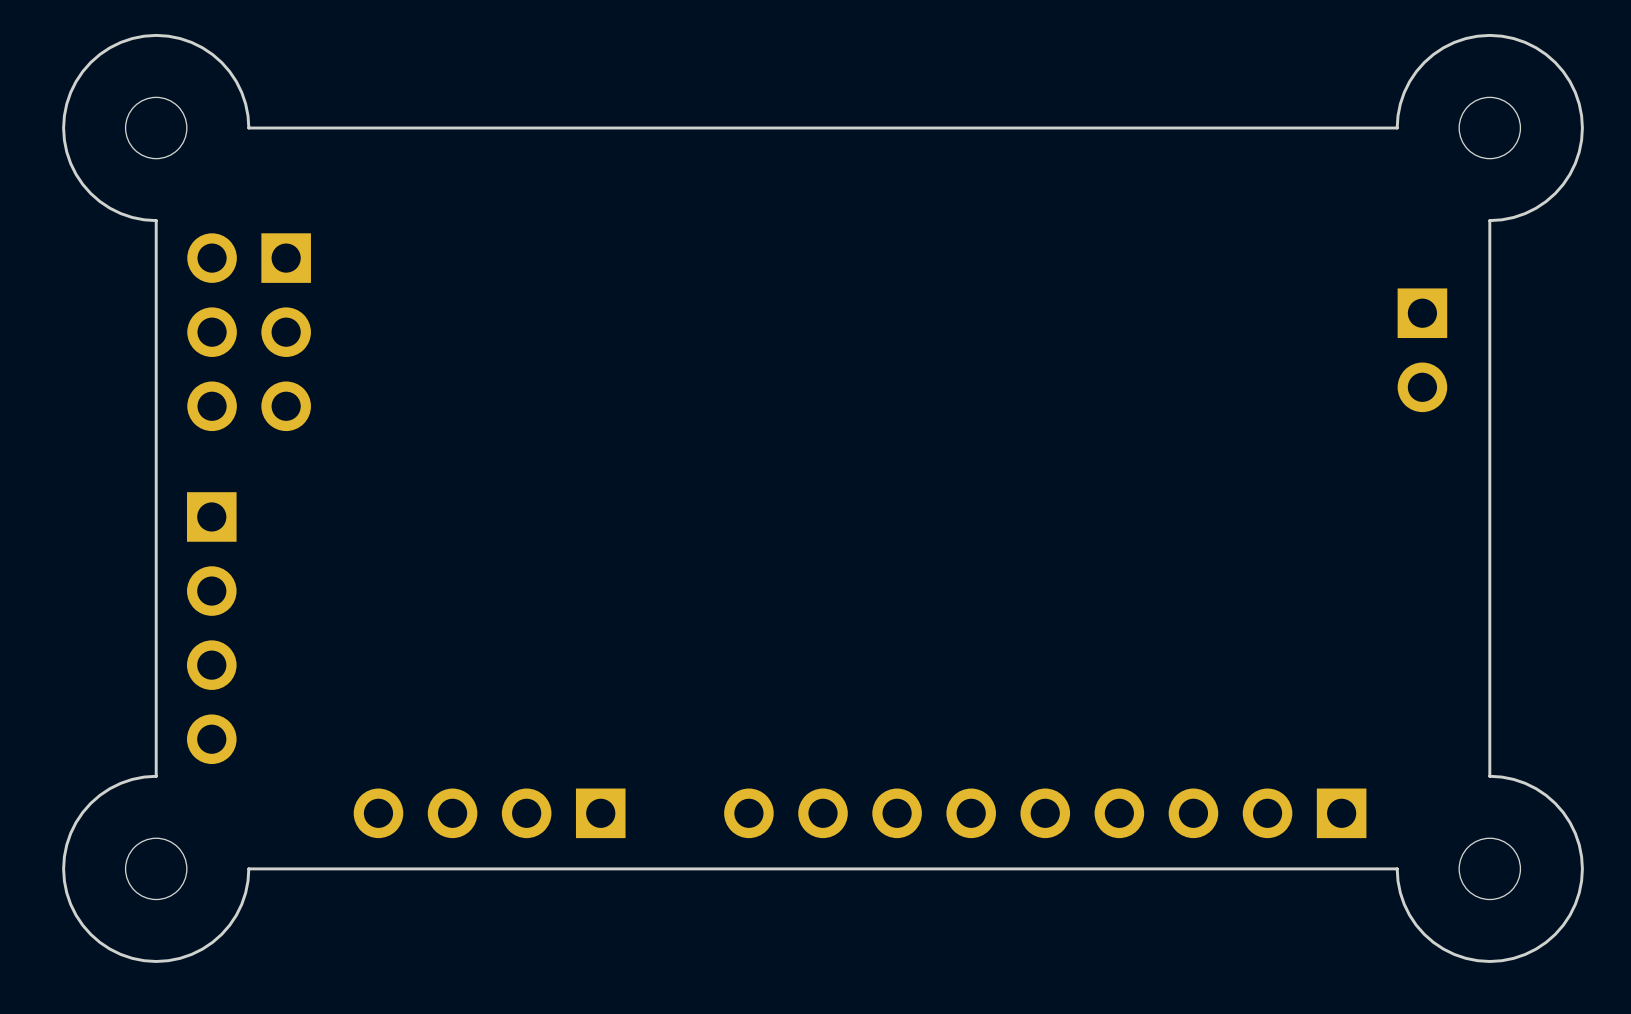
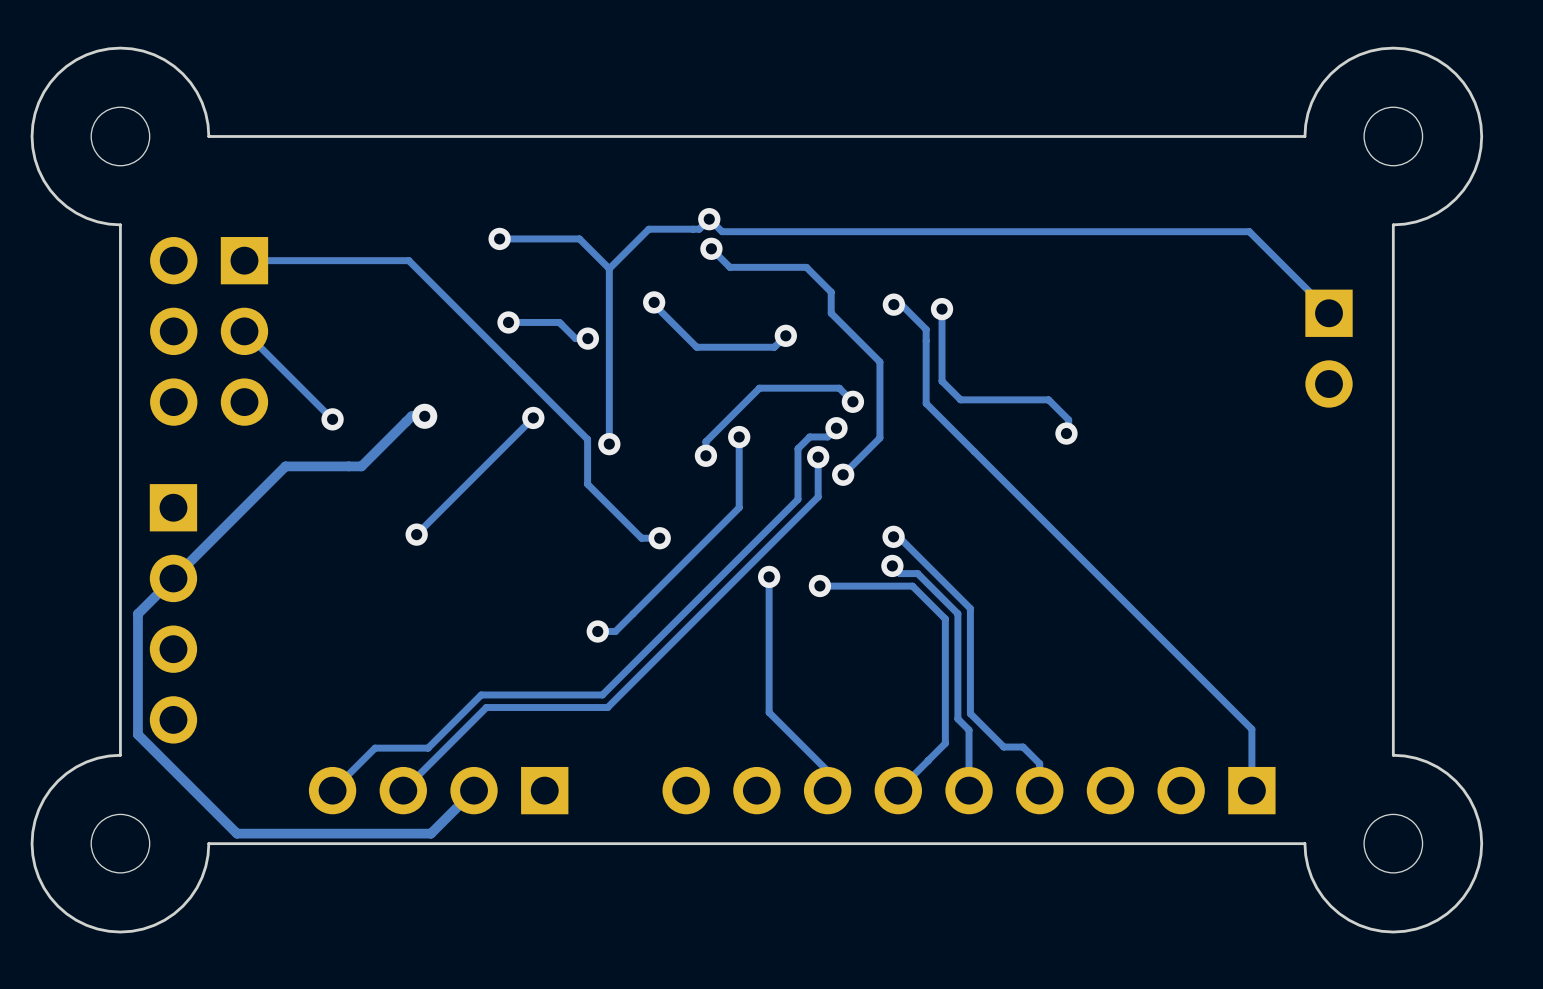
track: none -> (709, 219) (722, 231) (1249, 231) (1329, 313)
track: none -> (709, 219) (699, 229) (648, 229) (609, 268)
via: none -> (709, 219)
track: none -> (499, 238) (579, 238) (609, 268)
via: none -> (499, 238)
track: none -> (711, 248) (729, 267) (806, 267) (831, 292) (831, 313) (879, 362) (879, 438) (843, 474)
via: none -> (711, 248)
track: none -> (244, 260) (408, 260) (587, 439) (587, 484) (641, 538) (659, 538)
track: none -> (609, 268) (609, 444)
track: none -> (654, 302) (654, 304) (696, 347) (774, 347) (785, 335)
via: none -> (654, 302)
track: none -> (893, 304) (901, 304) (926, 329) (926, 403) (1251, 729) (1251, 790)
via: none -> (893, 304)
track: none -> (942, 309) (942, 381) (960, 399) (1048, 399) (1068, 419) (1068, 431) (1066, 433)
via: none -> (942, 309)
track: none -> (508, 322) (559, 322) (575, 338) (587, 338)
via: none -> (508, 322)
track: none -> (244, 331) (332, 419)
via: none -> (785, 335)
via: none -> (587, 338)
track: none -> (852, 401) (839, 388) (759, 388) (705, 441) (705, 455)
via: none -> (852, 401)
track: none -> (424, 416) (411, 416) (361, 466) (285, 466) (137, 613) (137, 734) (237, 833) (431, 833) (474, 790)
via: none -> (424, 416)
track: none -> (533, 417) (416, 534)
via: none -> (533, 417)
via: none -> (332, 419)
track: none -> (836, 428) (827, 436) (809, 436) (797, 448) (797, 499) (602, 694) (481, 694) (428, 748) (375, 748) (332, 790)
via: none -> (836, 428)
via: none -> (1066, 433)
track: none -> (739, 437) (739, 507) (615, 631) (597, 631)
via: none -> (739, 437)
via: none -> (609, 444)
via: none -> (705, 455)
track: none -> (818, 457) (818, 496) (607, 707) (486, 707) (403, 790)
via: none -> (818, 457)
via: none -> (843, 474)
via: none -> (416, 534)
track: none -> (893, 536) (898, 536) (970, 608) (970, 713) (1003, 747) (1023, 747) (1039, 763) (1039, 790)
via: none -> (893, 536)
via: none -> (659, 538)
track: none -> (892, 565) (900, 573) (917, 573) (957, 613) (957, 718) (969, 730) (969, 790)
via: none -> (892, 565)
track: none -> (769, 576) (769, 712) (827, 770) (827, 790)
via: none -> (769, 576)
via: none -> (819, 585)
track: none -> (820, 586) (912, 586) (945, 618) (945, 743) (898, 790)
via: none -> (597, 631)

